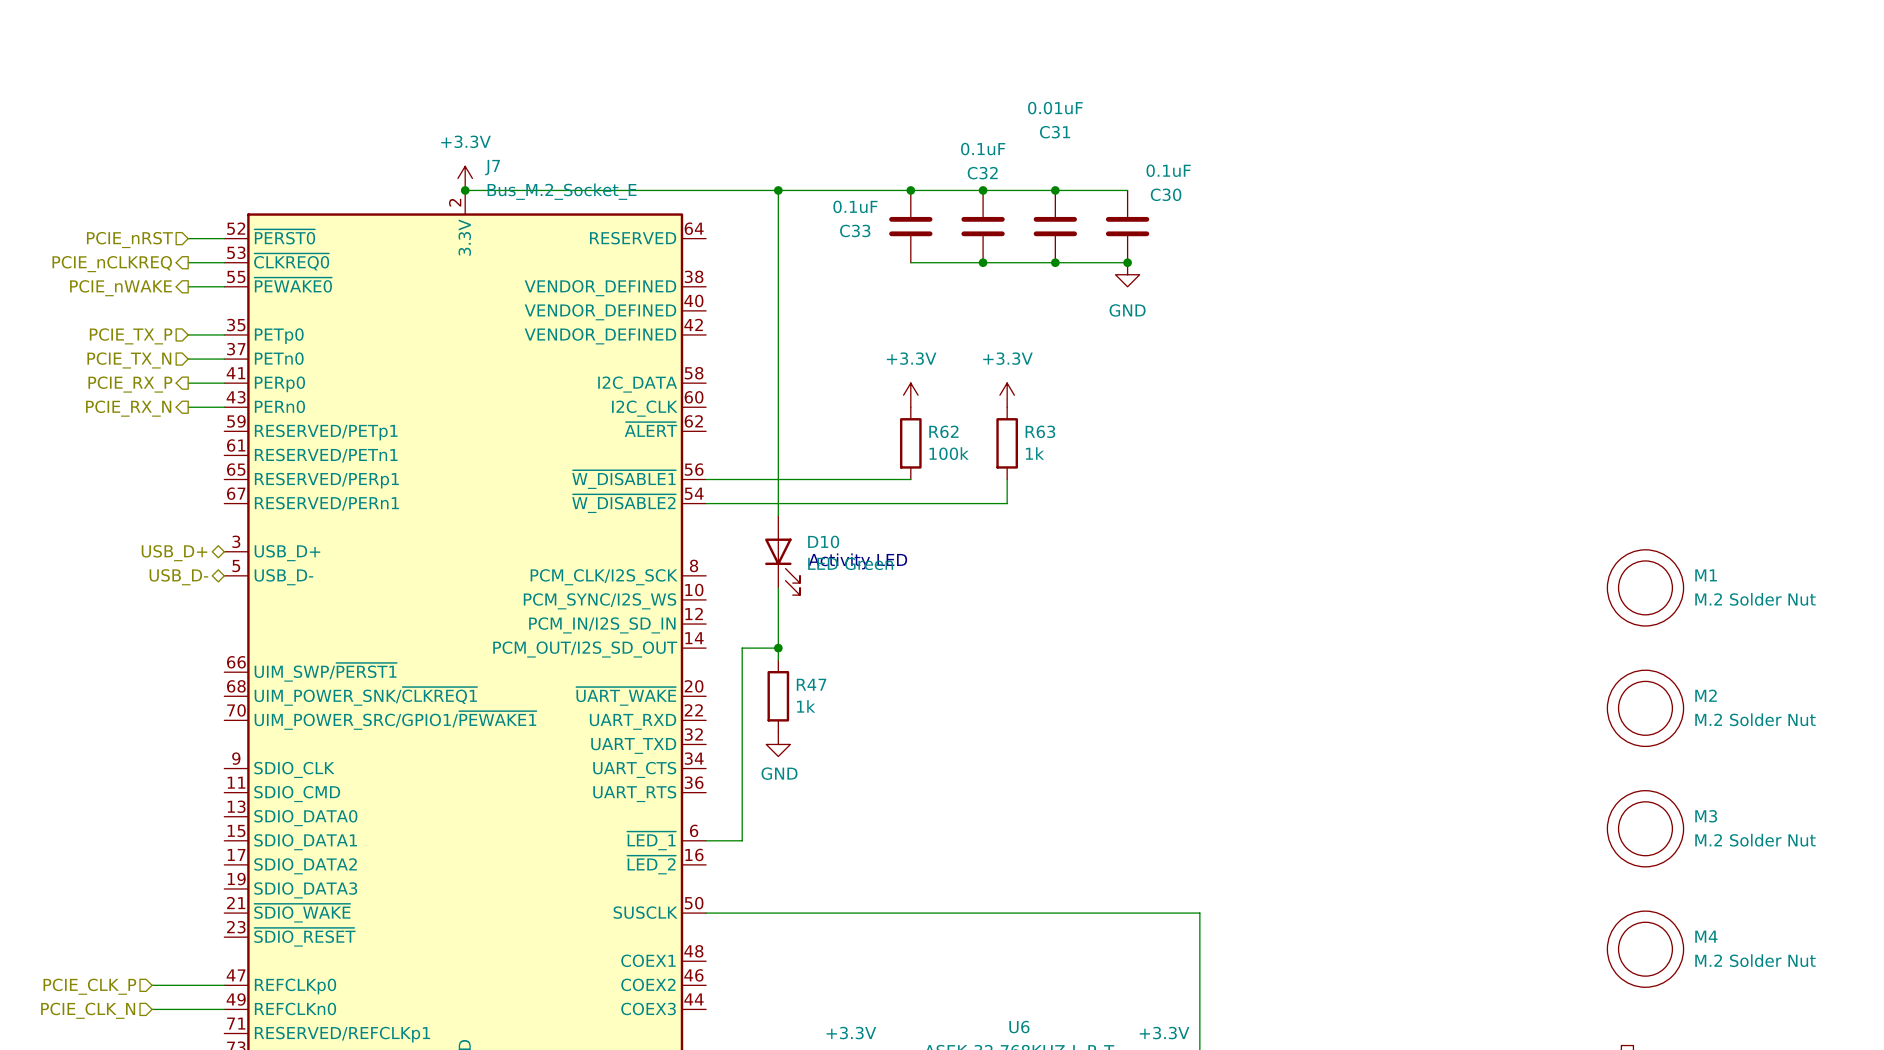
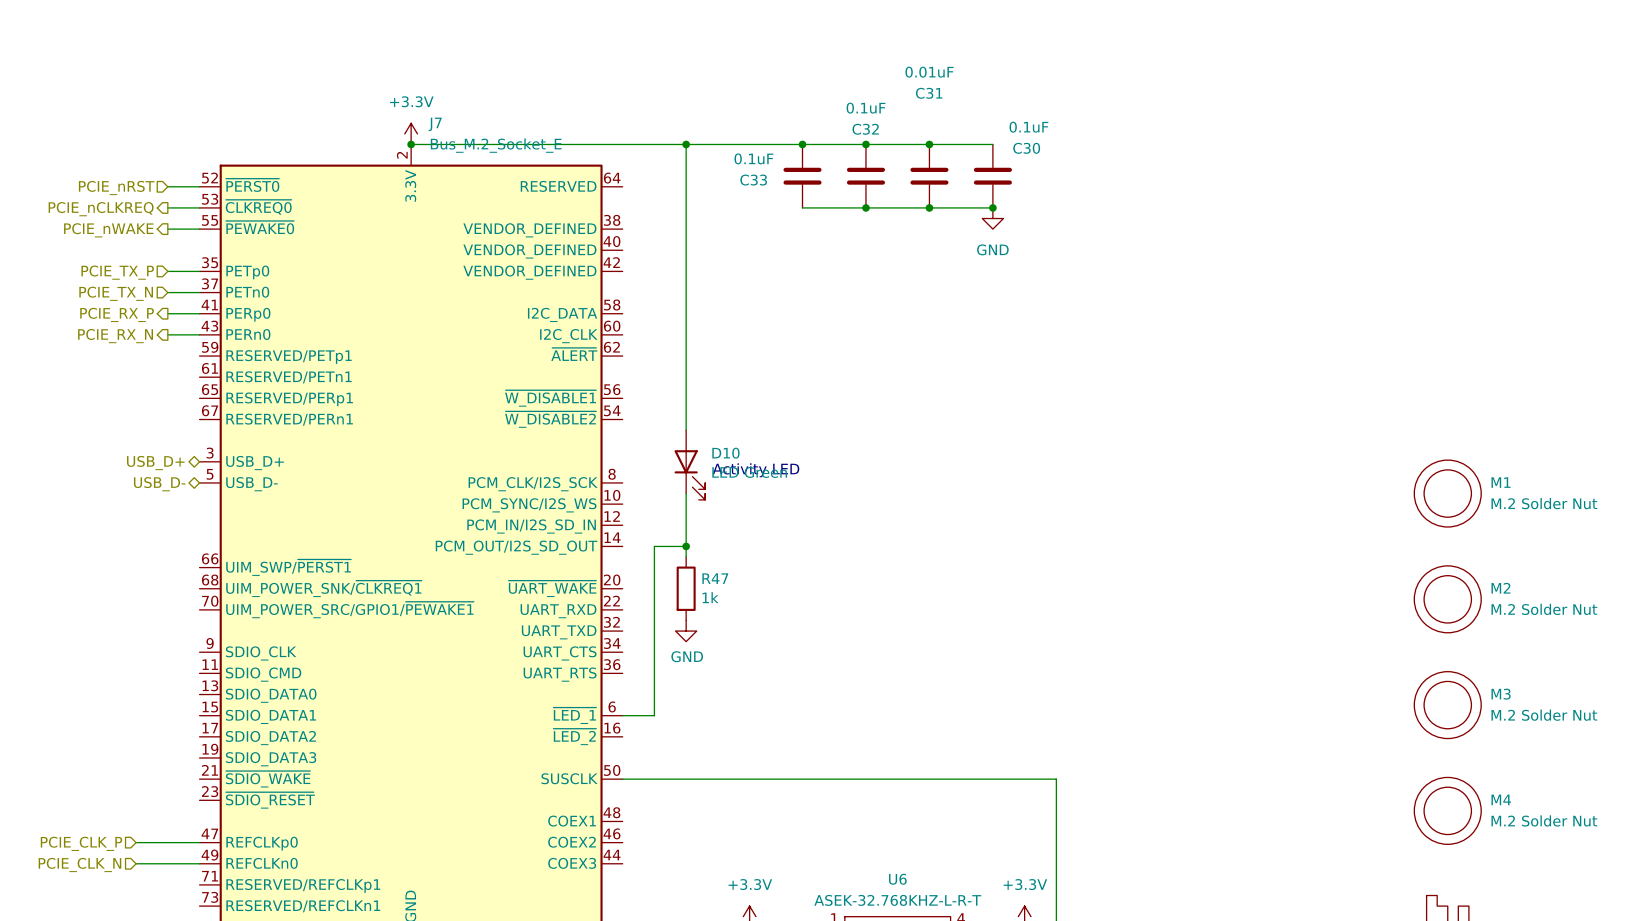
power symbol: +3.3V (910, 395) -> none
power symbol: +3.3V (1007, 395) -> none
R62: 100k (910, 443) -> none
R63: 1k (1007, 443) -> none
wire: (706, 479) (910, 479) -> none
wire: (1007, 479) (1007, 503) (706, 503) -> none

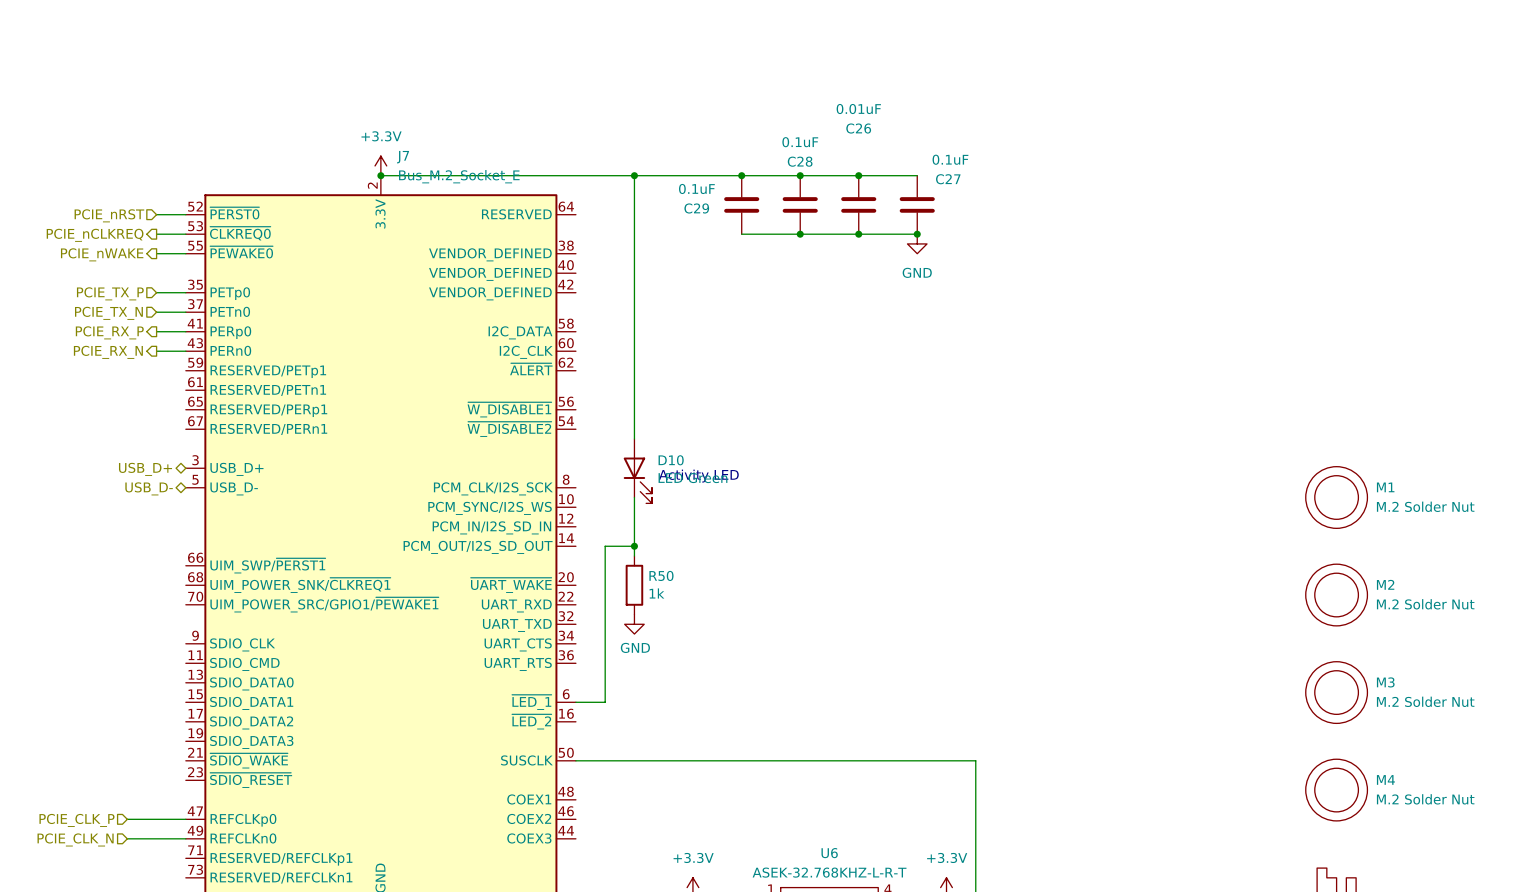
C31 name: C31 (929, 93) -> C26 (858, 128)
C32 name: C32 (865, 129) -> C28 (800, 161)
C30 name: C30 (1026, 148) -> C27 (948, 179)
C33 name: C33 (753, 180) -> C29 (696, 208)
R47 name: R47 (715, 578) -> R50 (661, 575)

